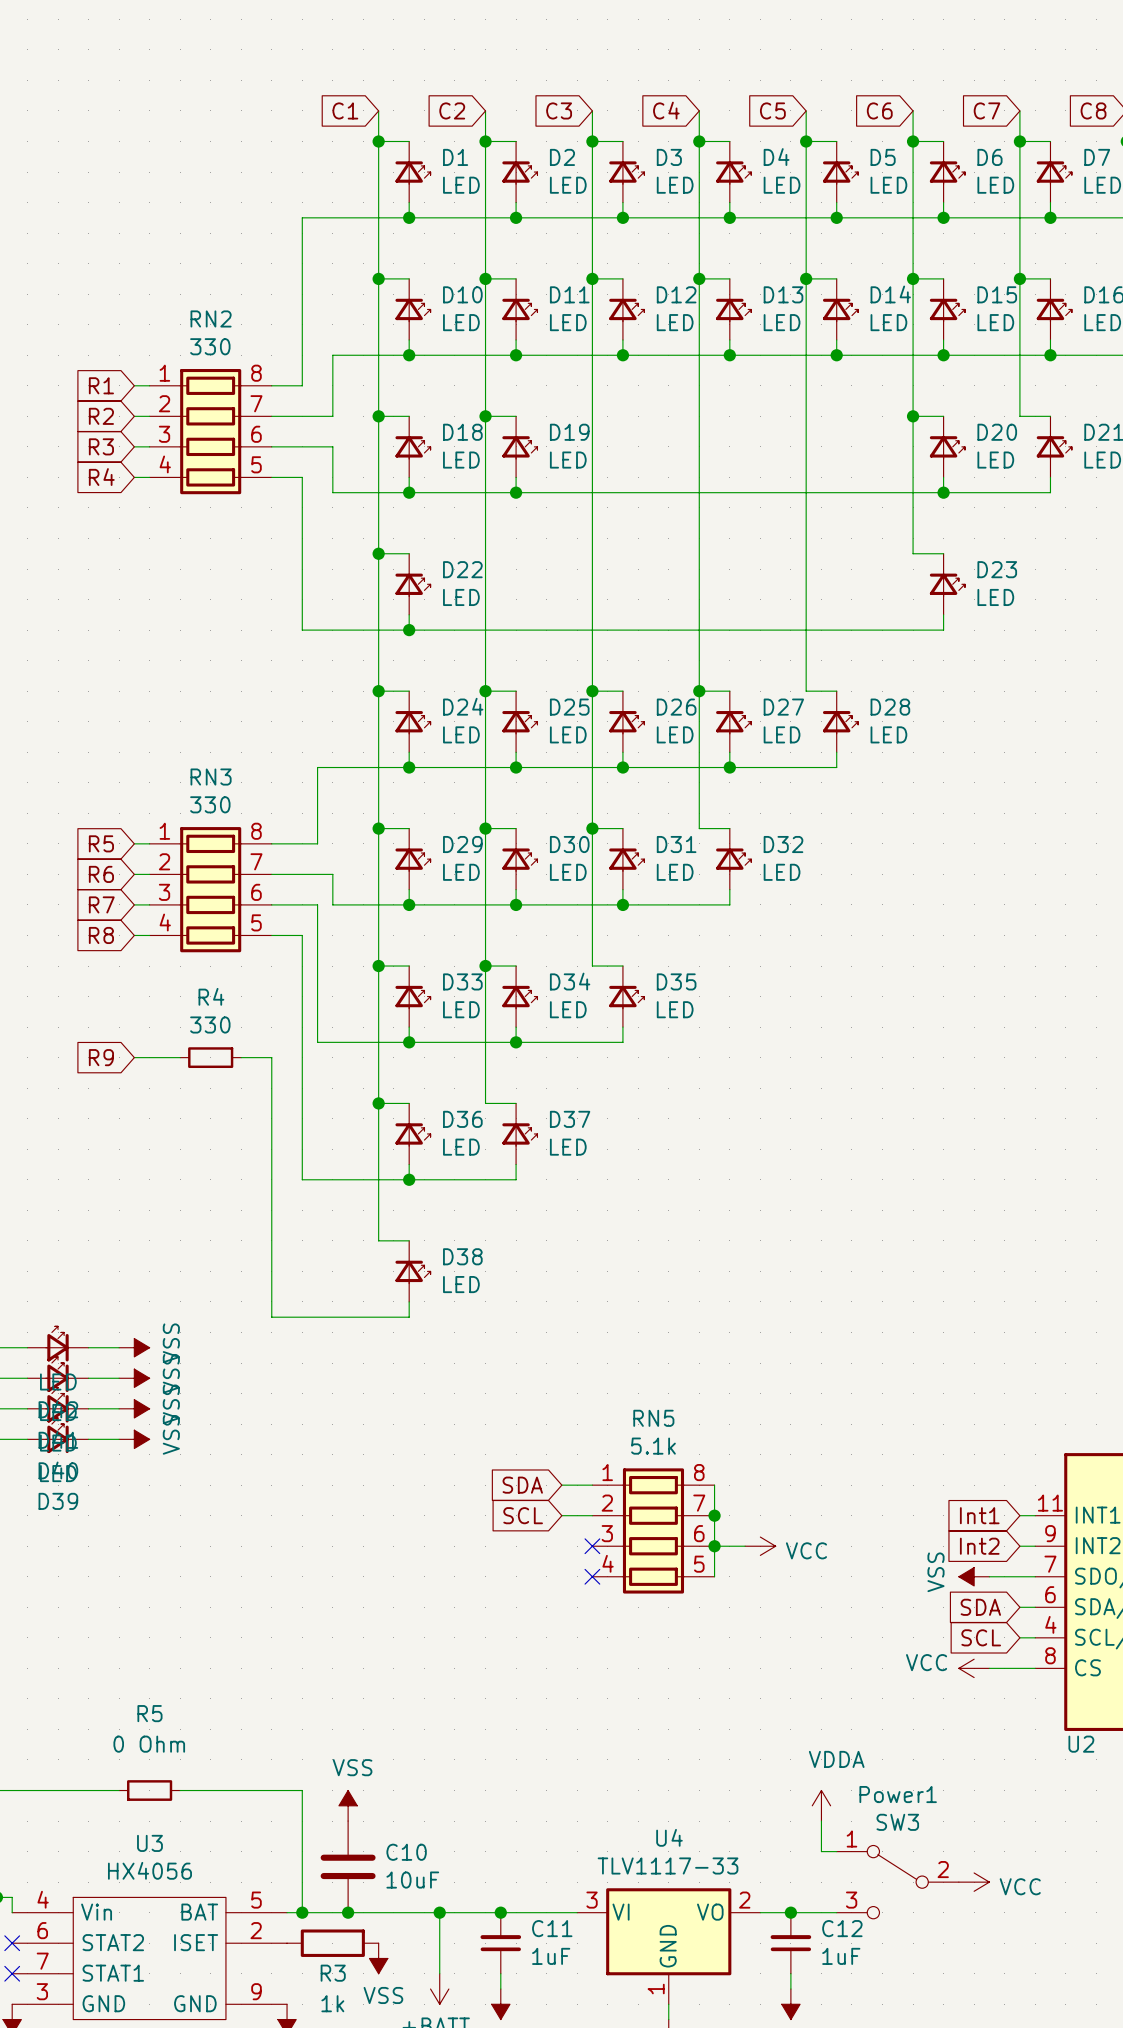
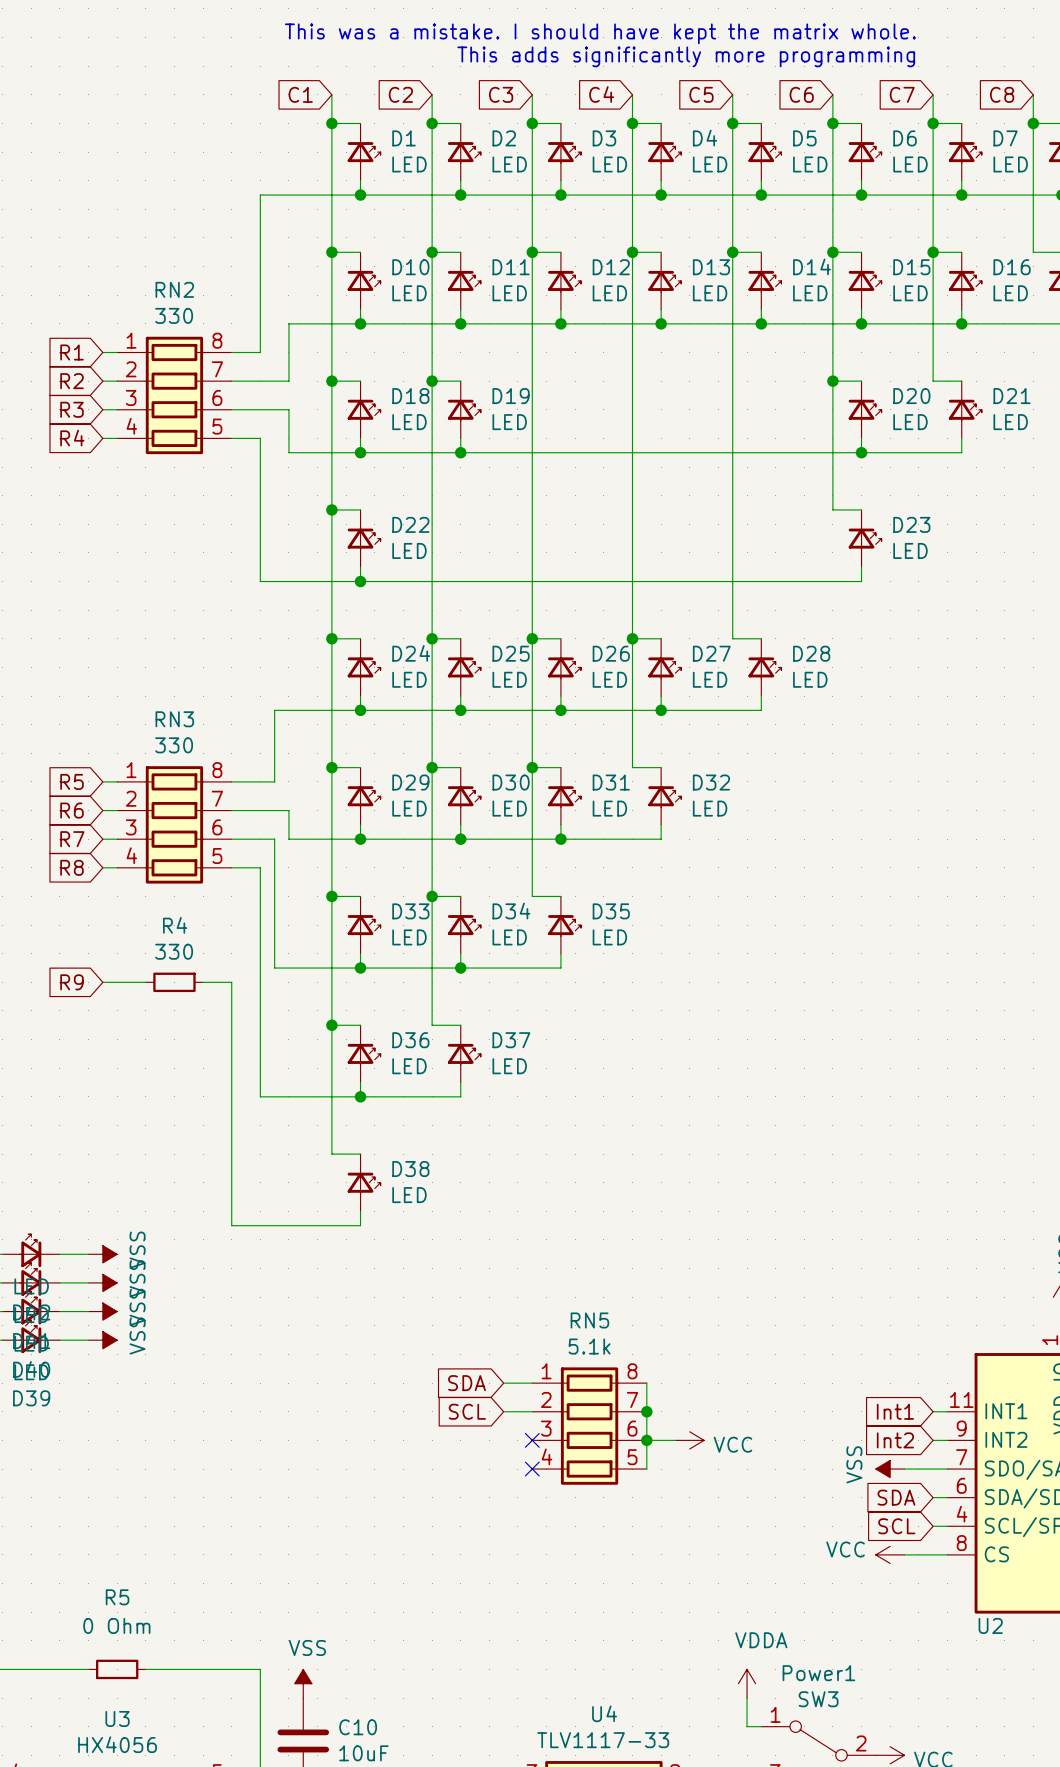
text: none -> This was a mistake. I should have kept the matrix whole. (600, 33)
text: none -> This adds significantly more programming (686, 56)

